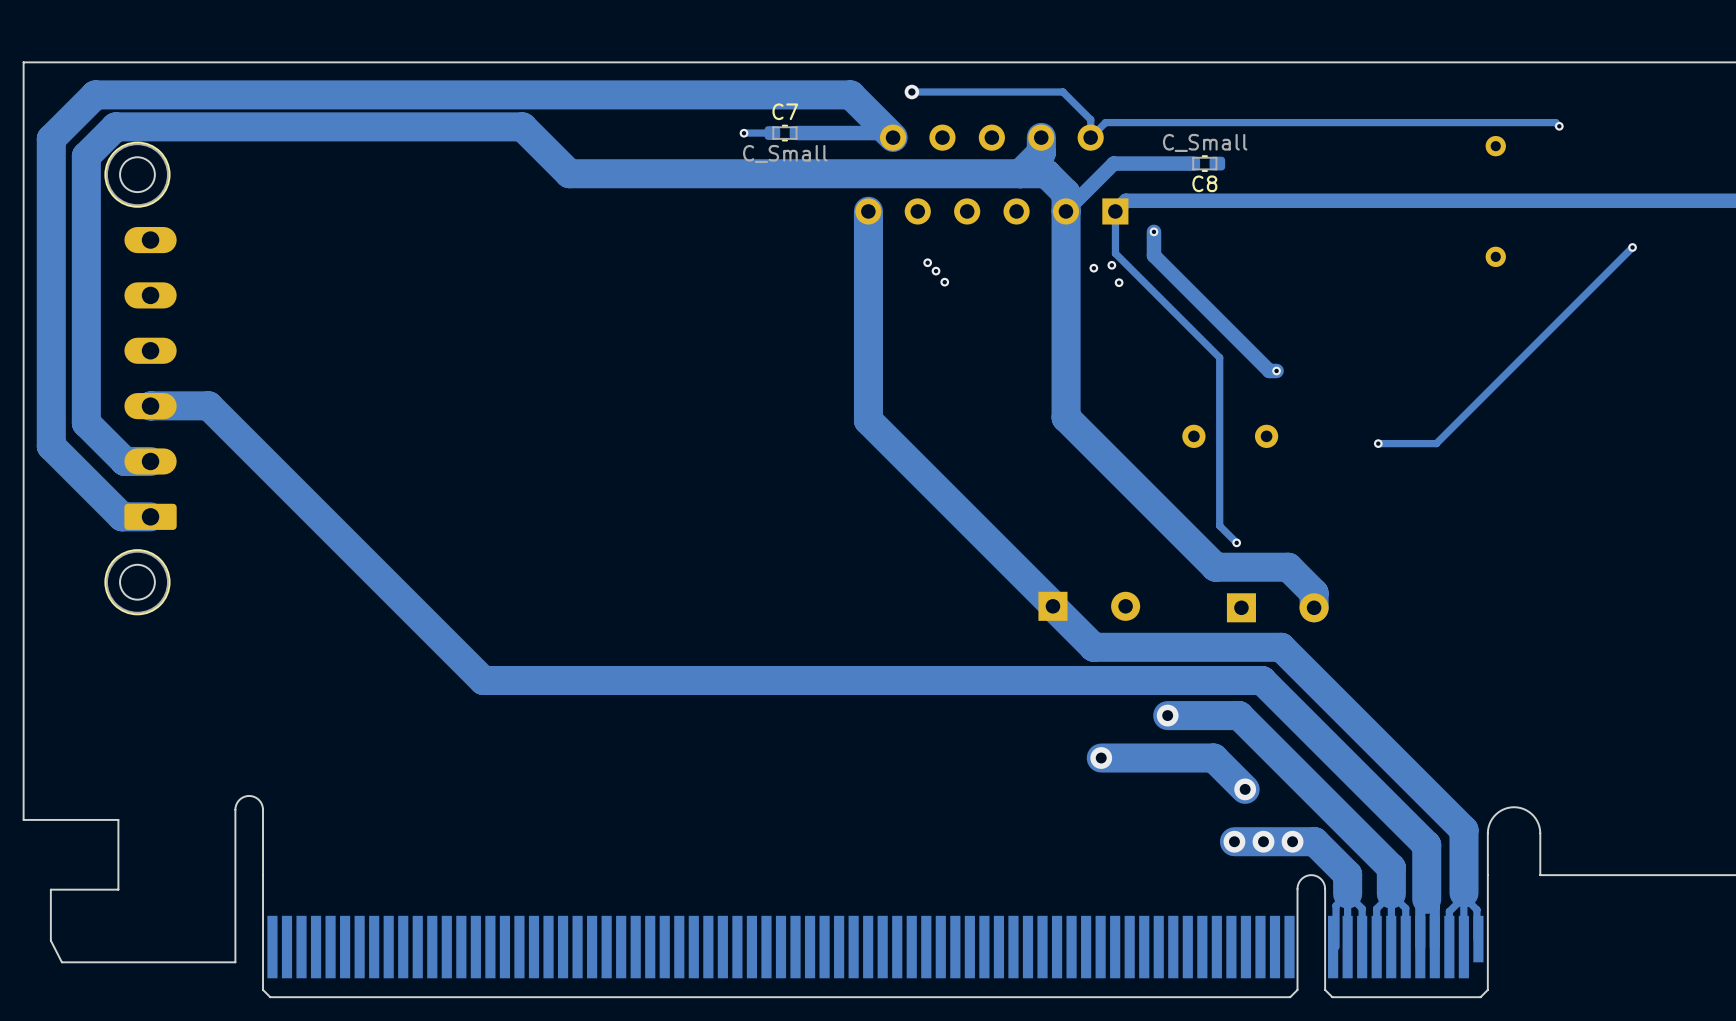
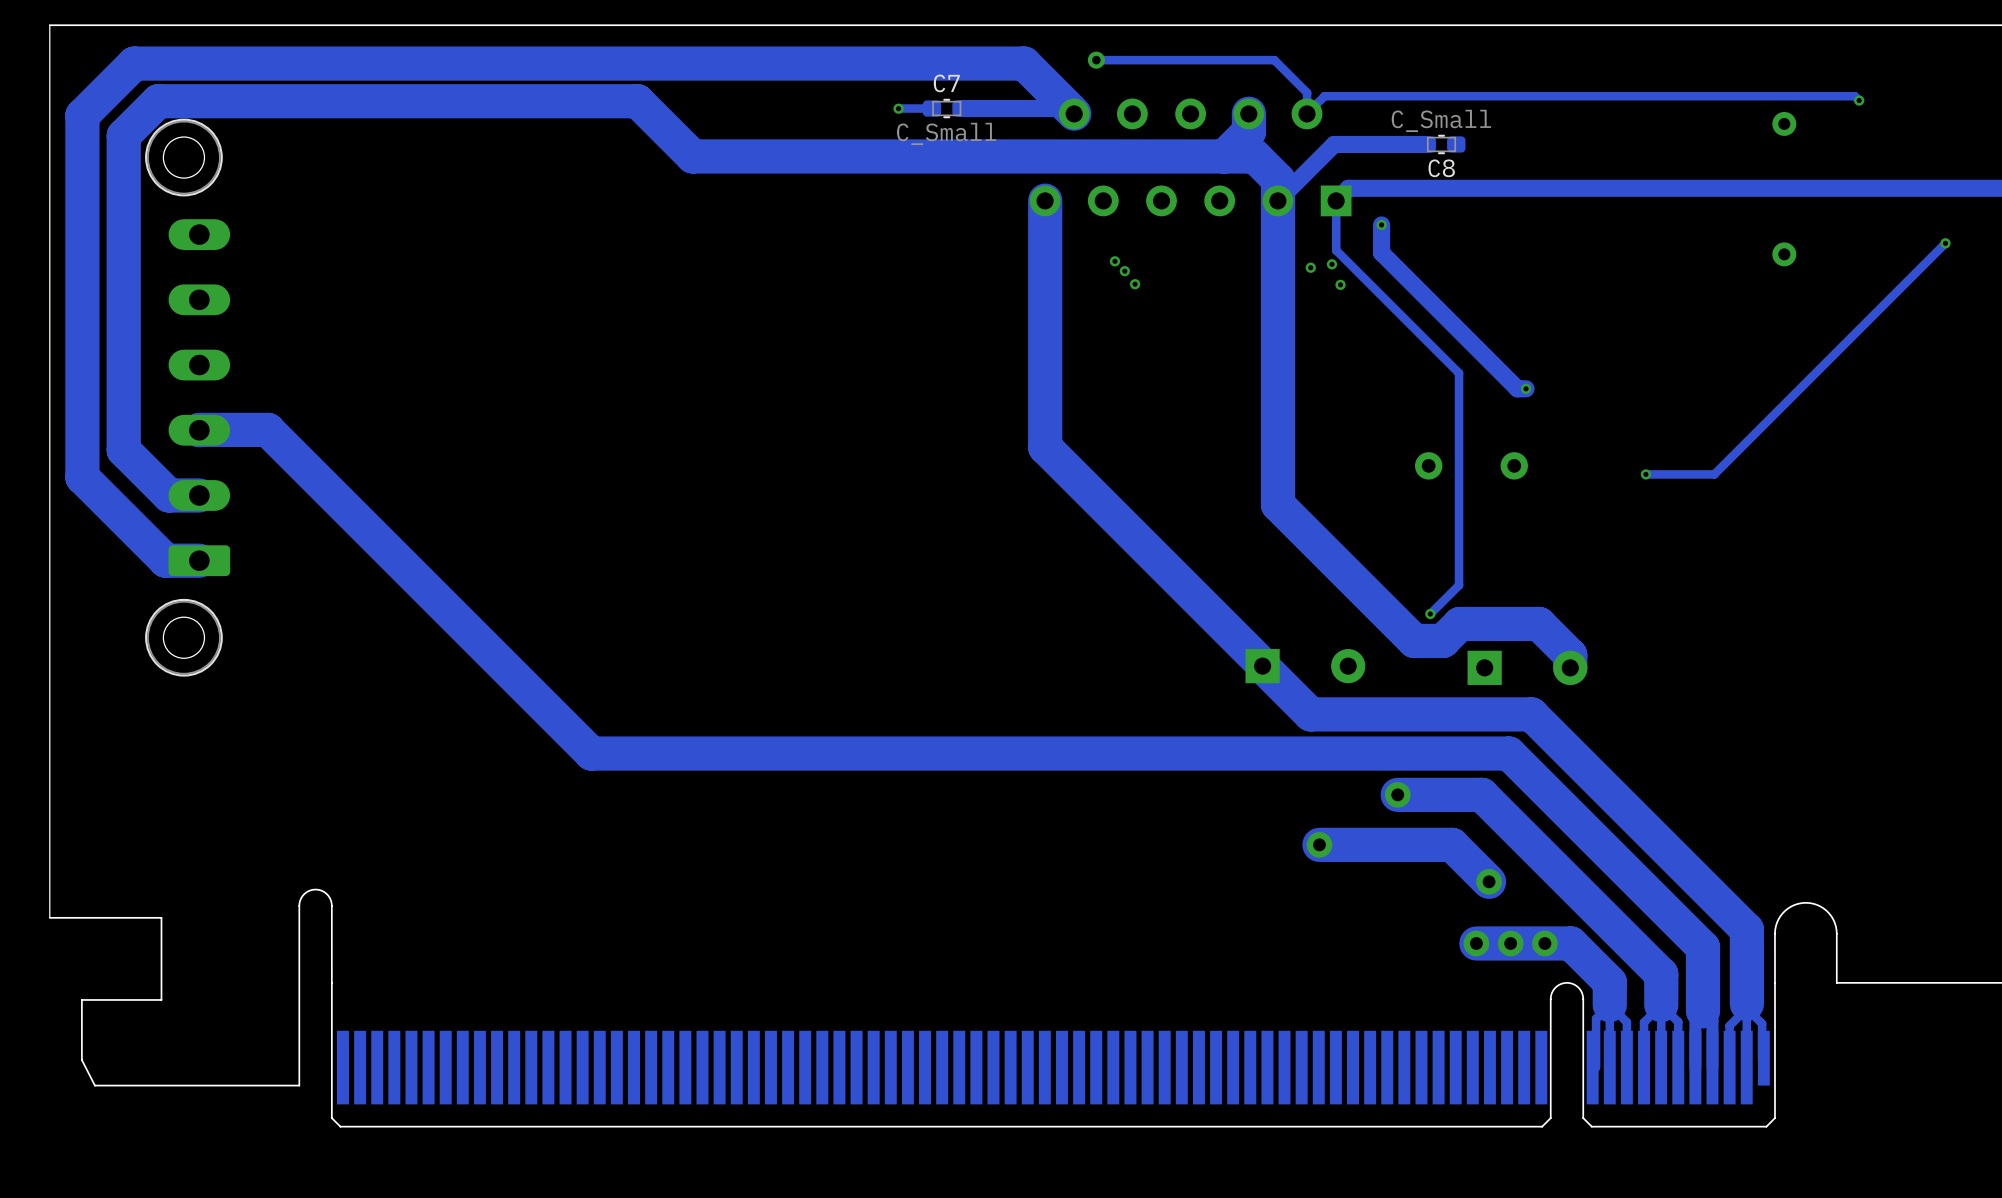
track: (1066, 417) (1215, 567) (1288, 567) (1314, 593) (1314, 597) -> (1278, 443) (1278, 504) (1414, 640) (1442, 640) (1459, 623) (1539, 623) (1570, 655)
track: (1219, 525) (1236, 542) -> (1459, 571) (1459, 585) (1430, 613)
via position: (1236, 542) -> (1430, 613)

